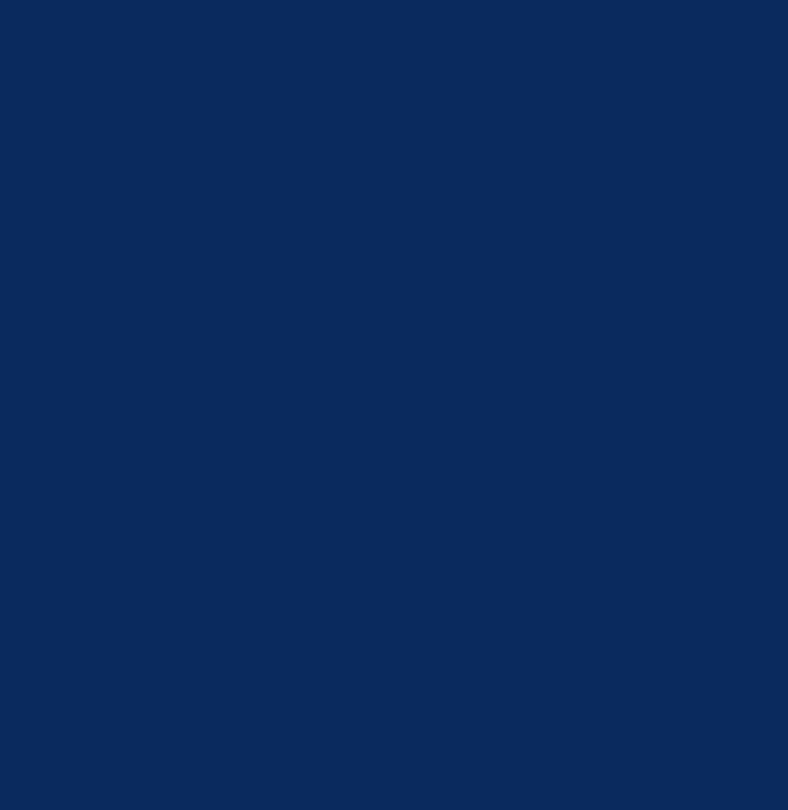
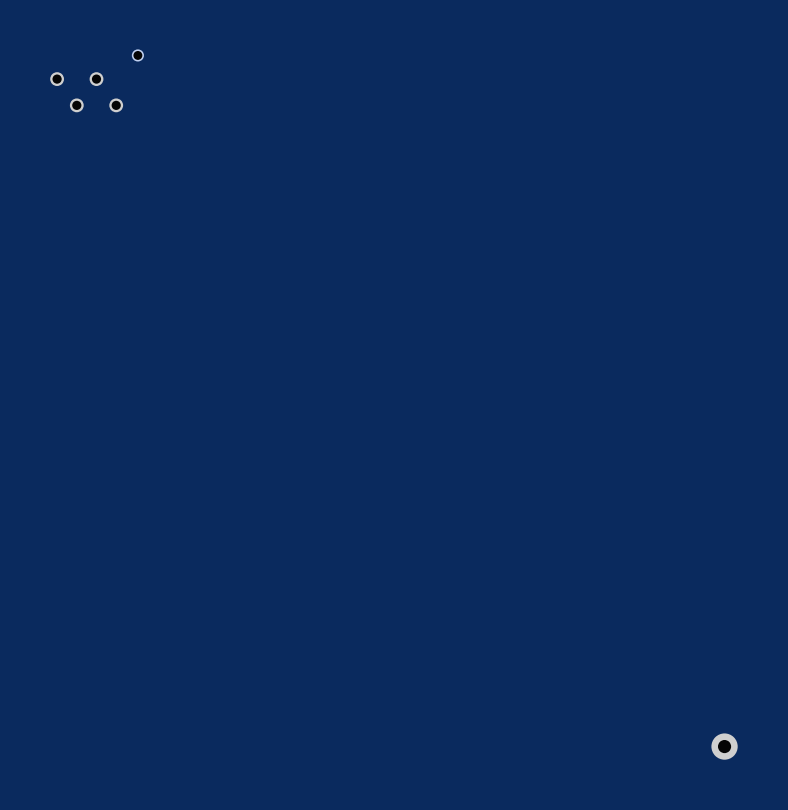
part: none -> (96, 81)
part: none -> (724, 746)

